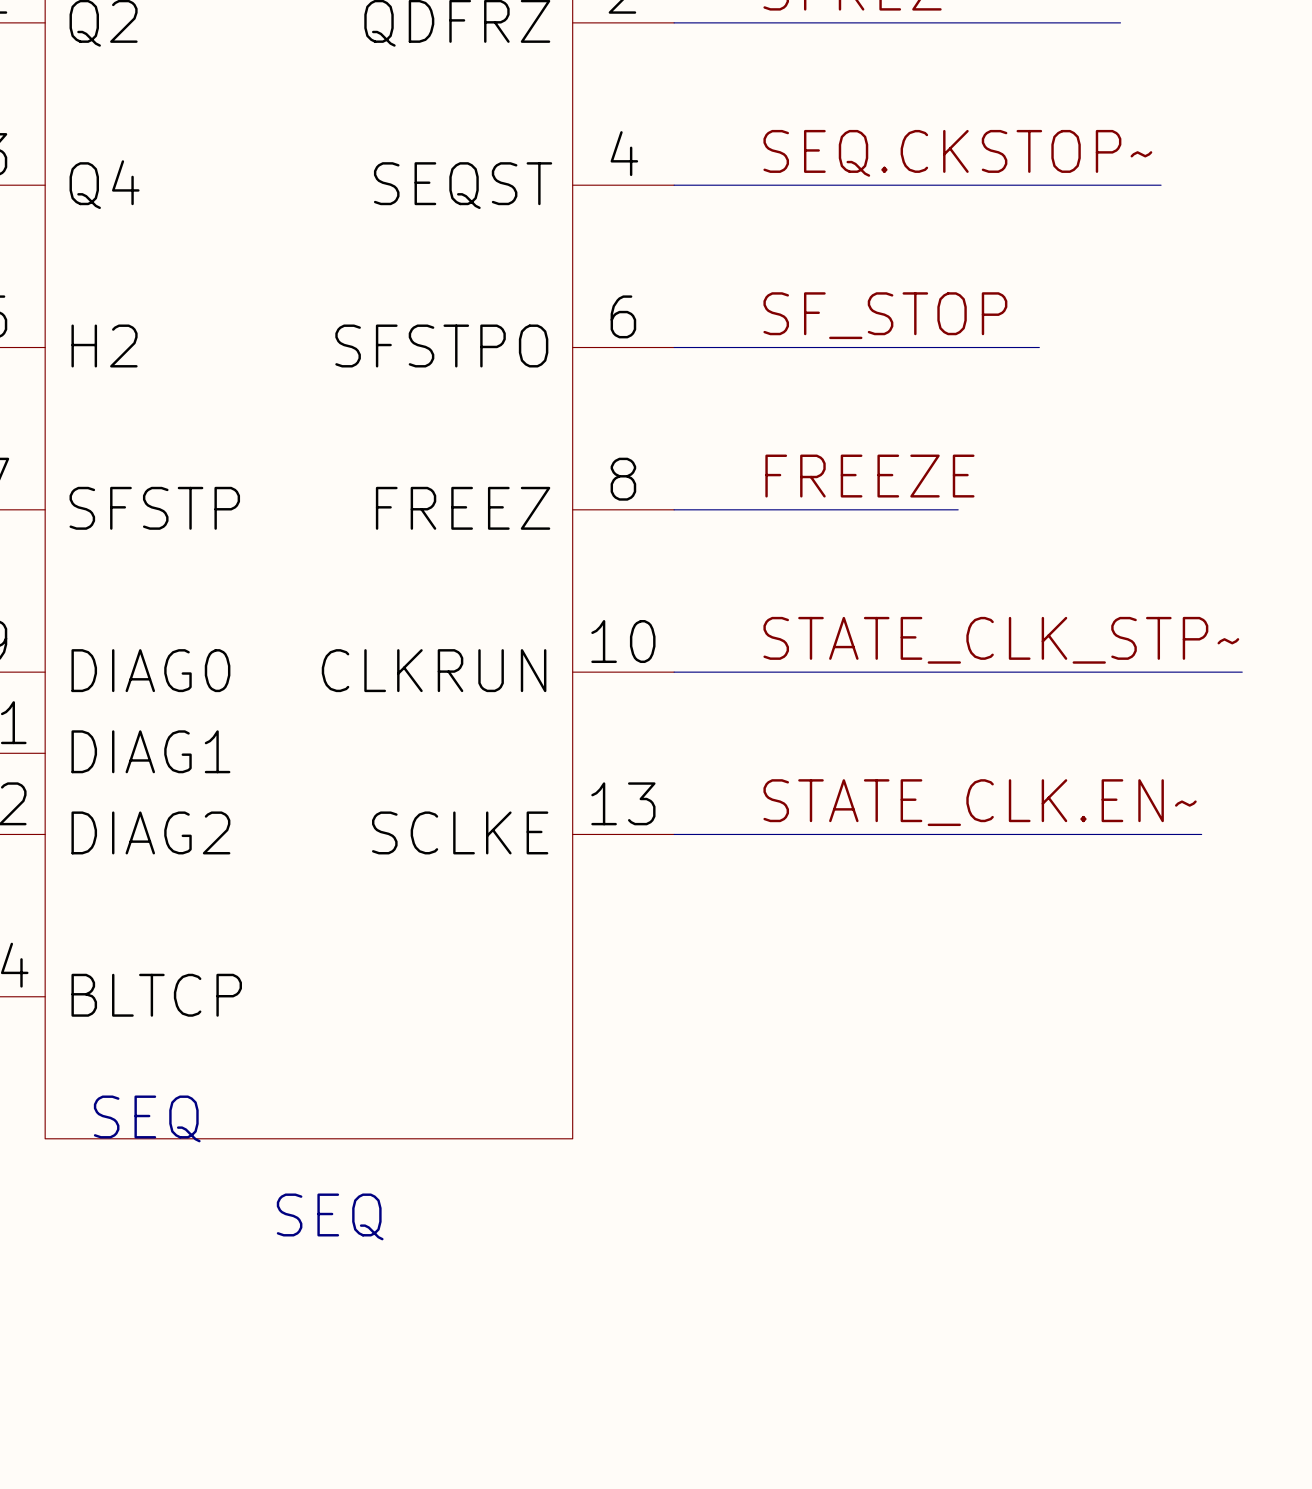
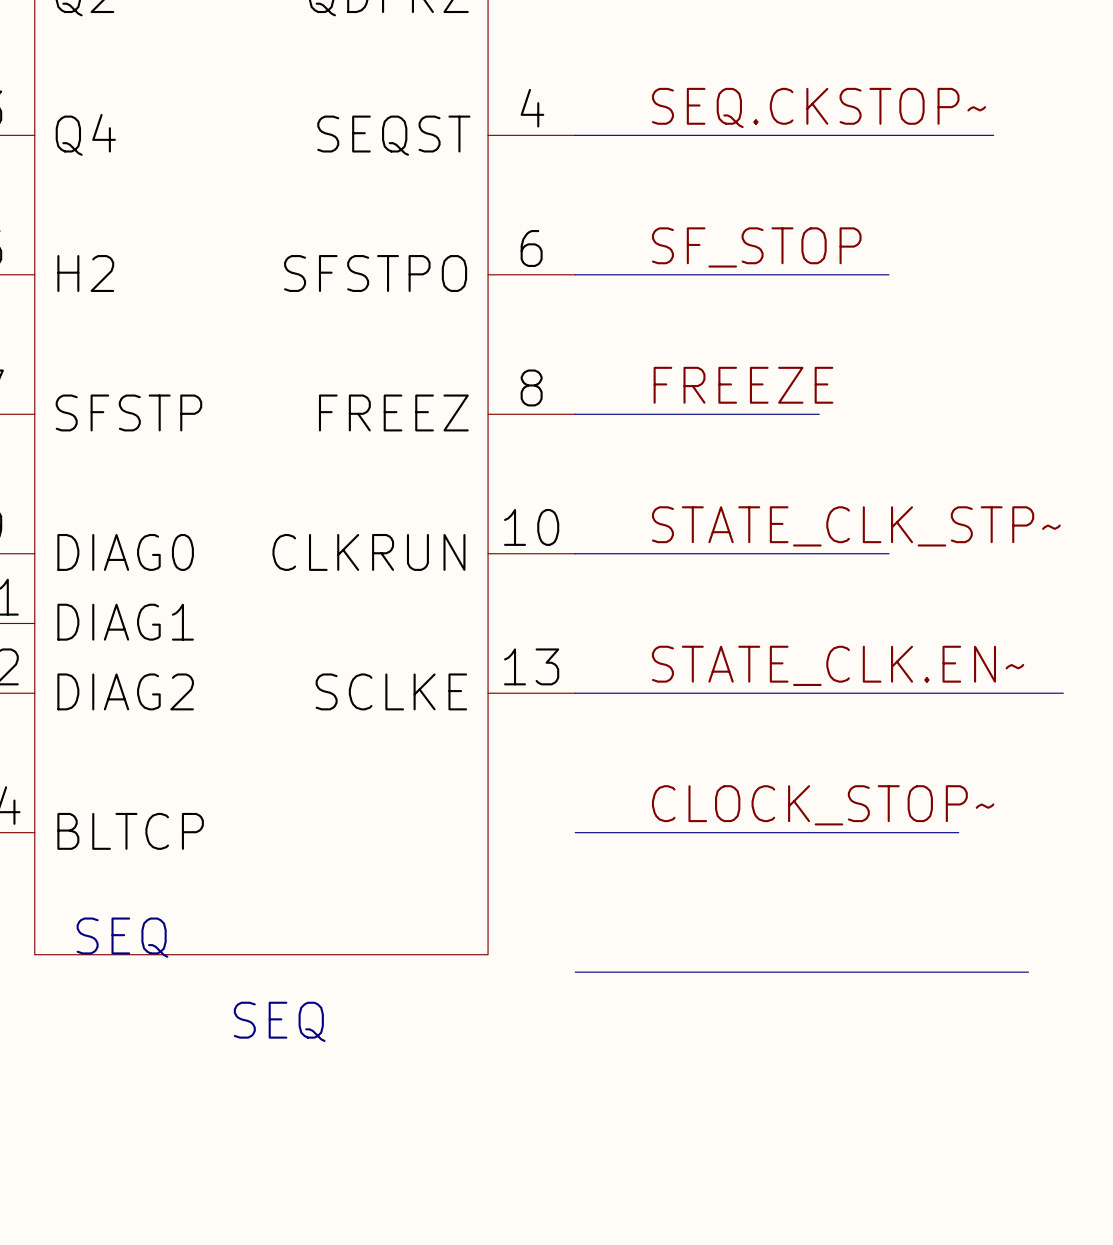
wire: (1039, 672) (1242, 672) -> none
wire: none -> (1028, 693) (1063, 693)
label: none -> CLOCK_STOP~ (823, 805)
wire: none -> (575, 832) (958, 832)
wire: none -> (575, 972) (1028, 972)

